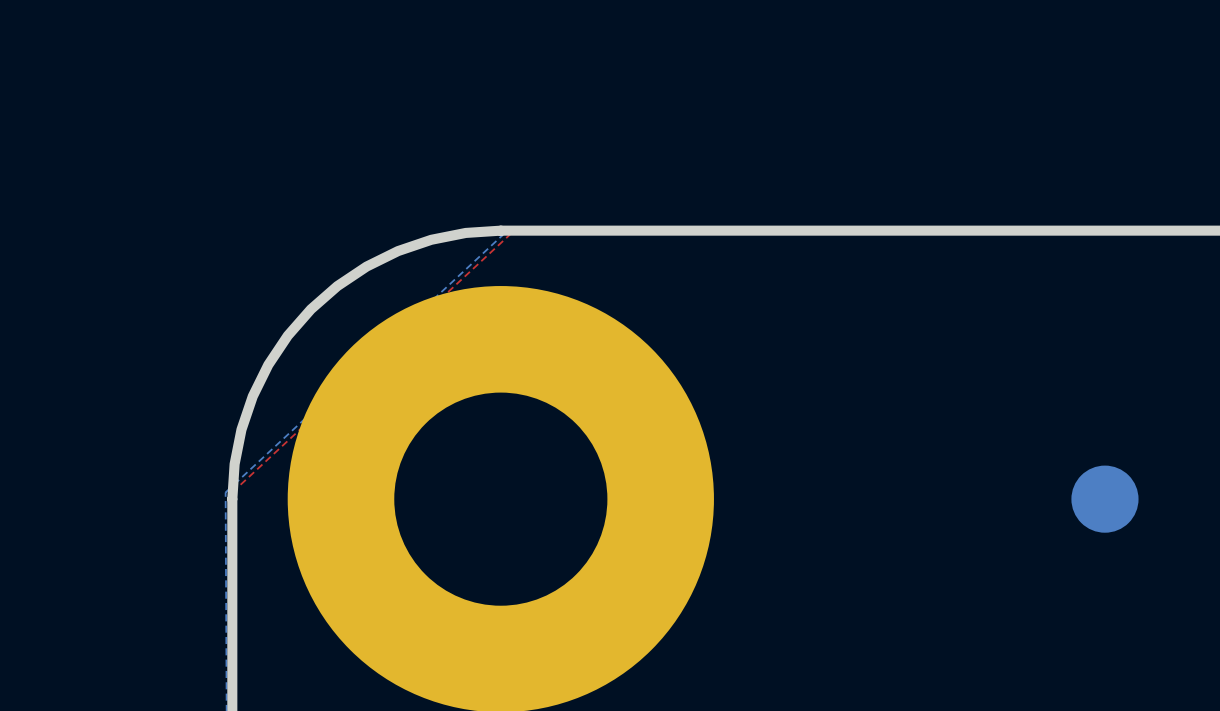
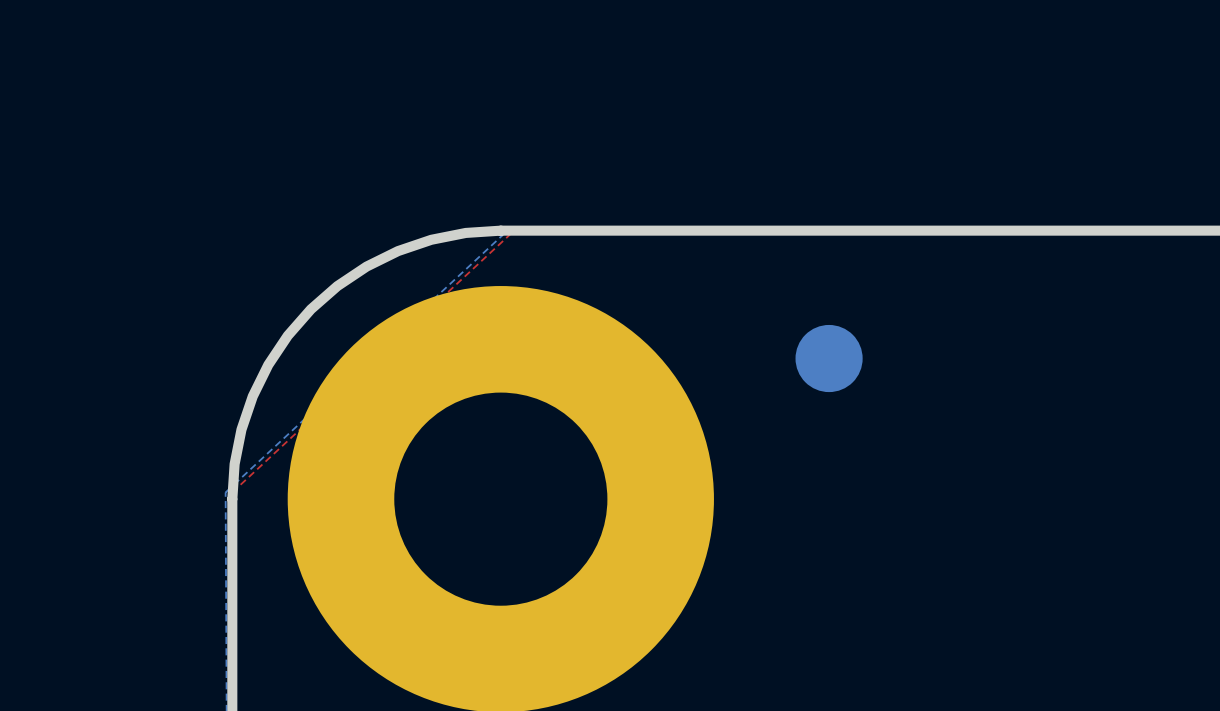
part position: (1104, 499) -> (829, 358)

